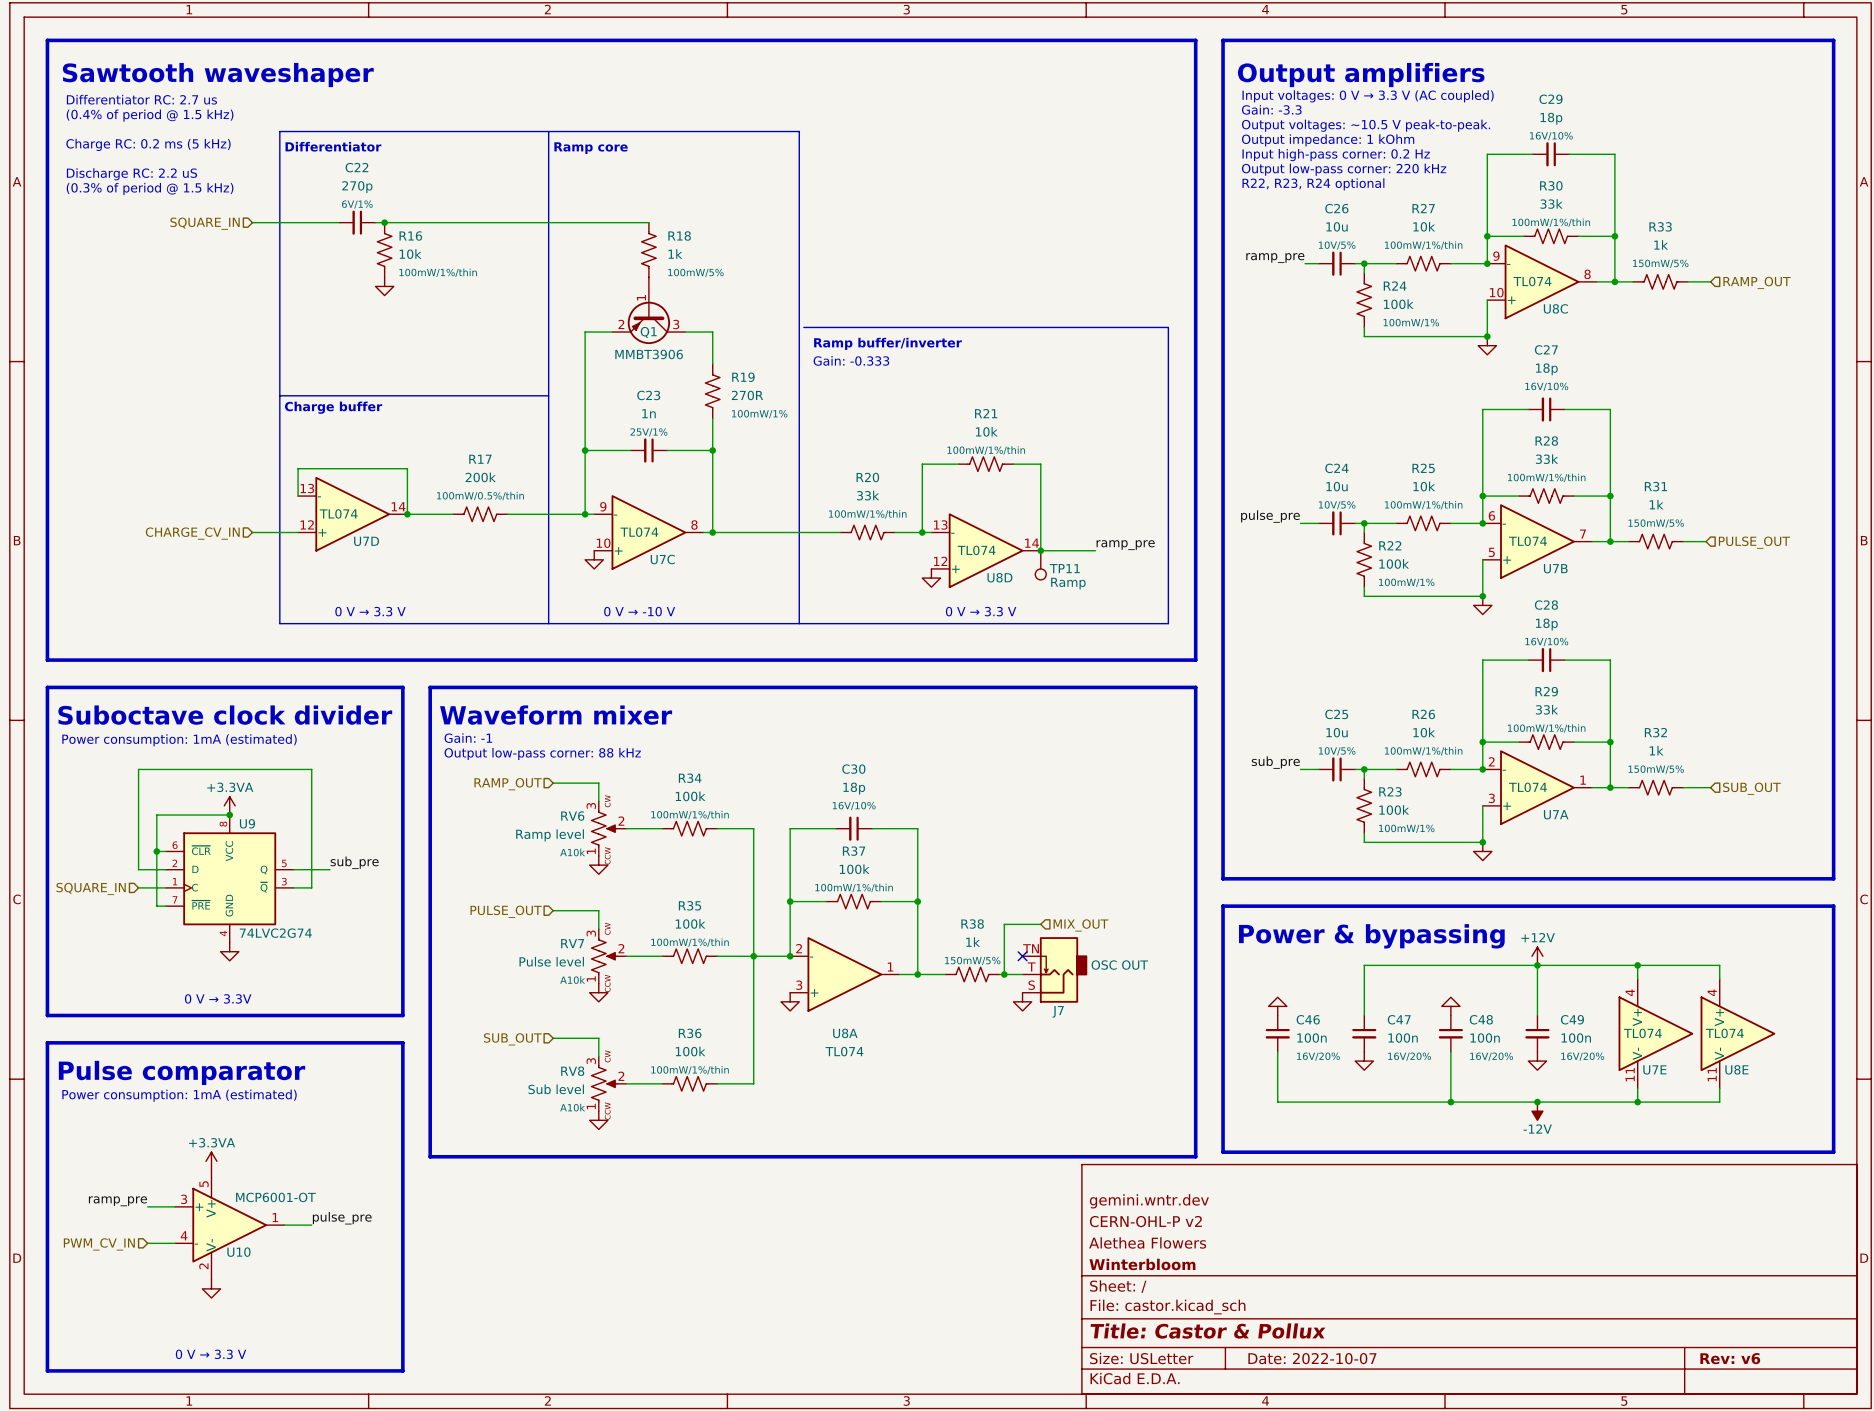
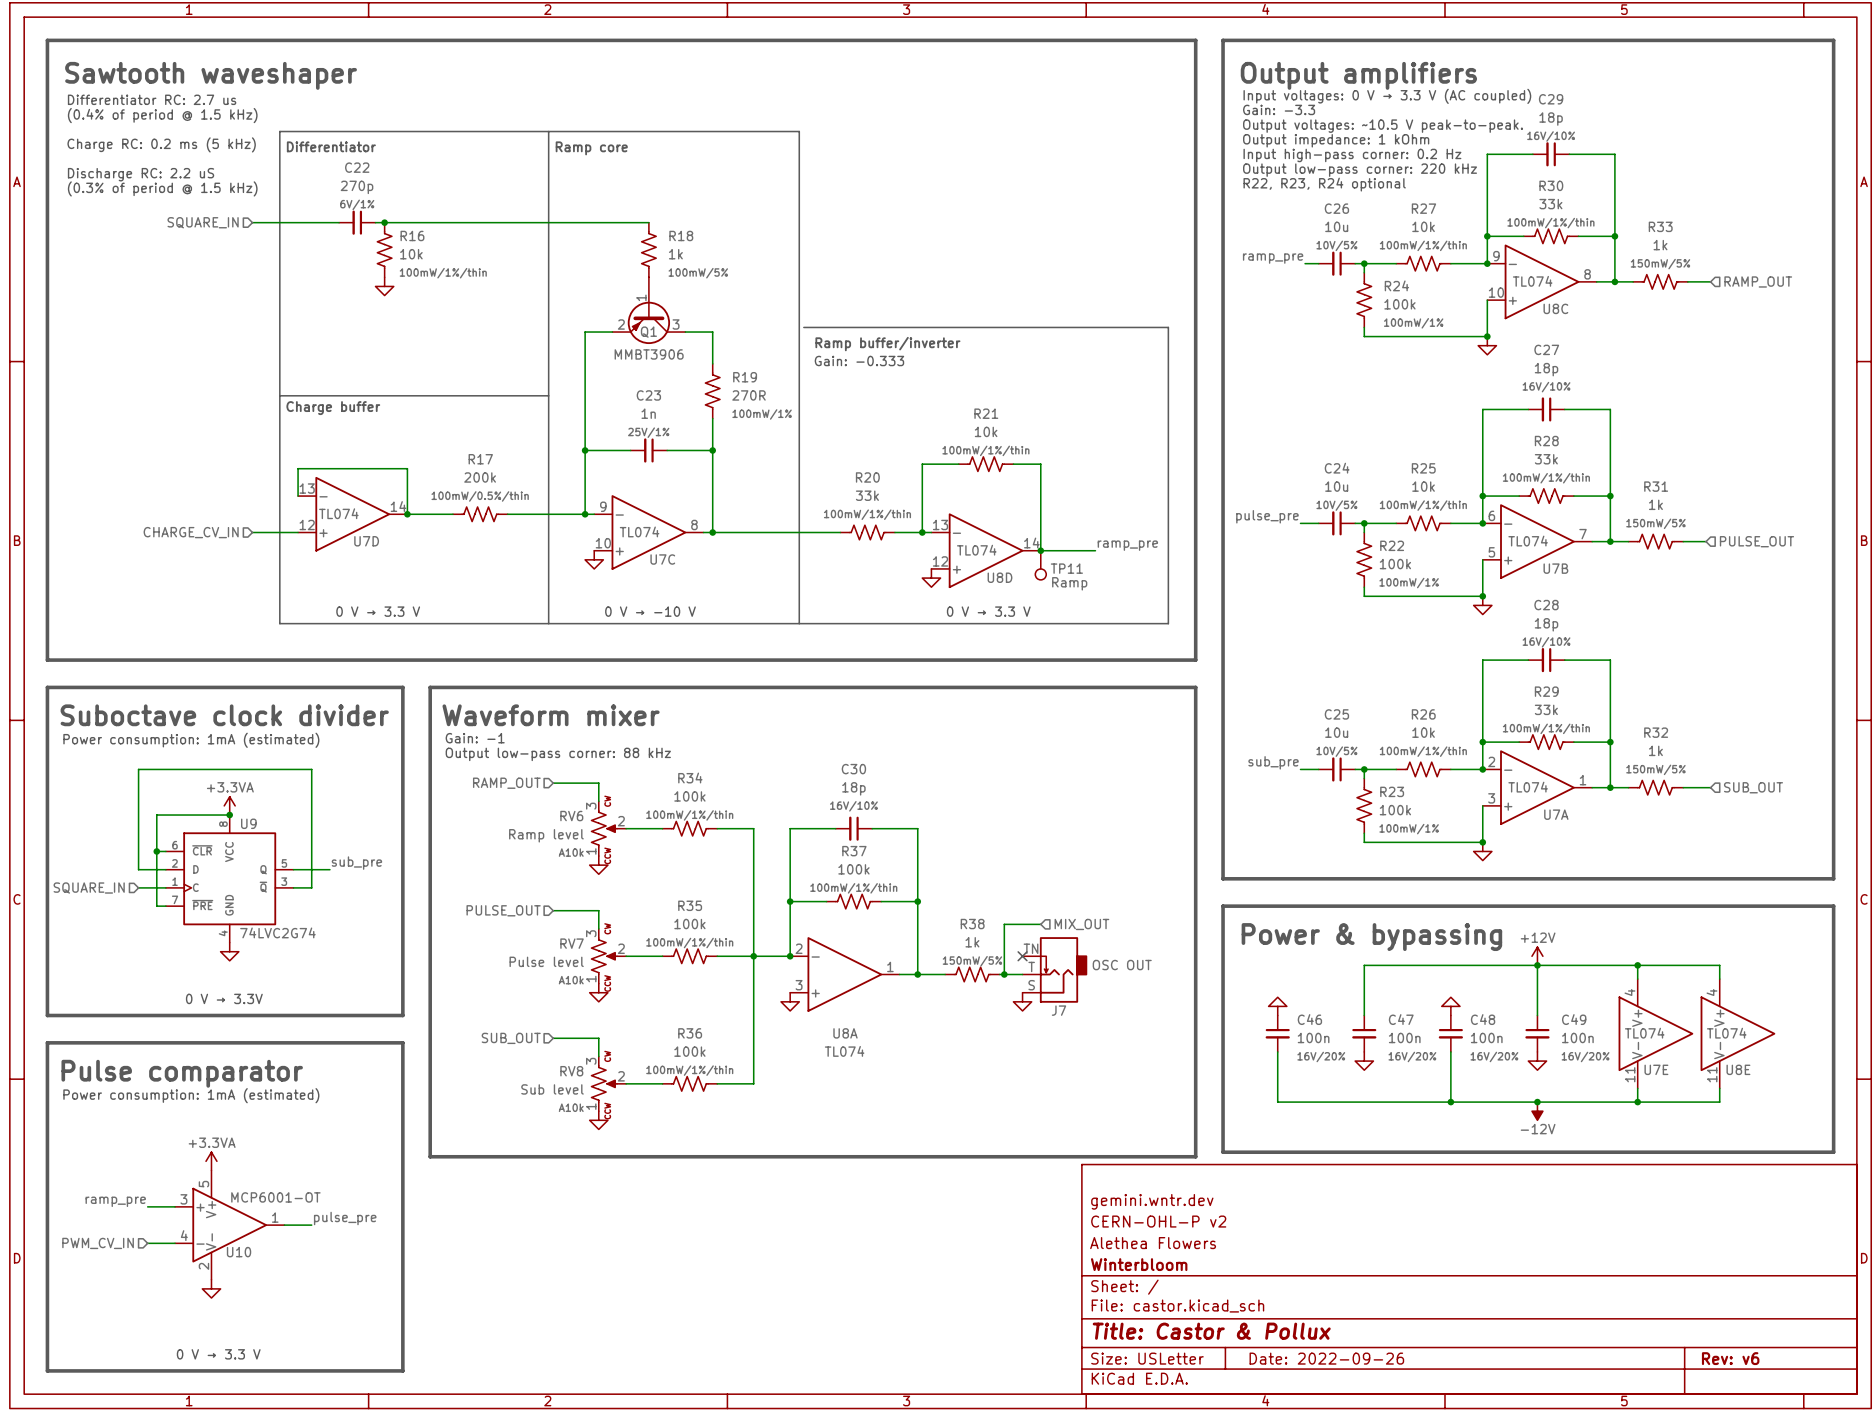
title block: Date: 2022-10-07 (1312, 1358) -> Date: 2022-09-26 (1326, 1358)

